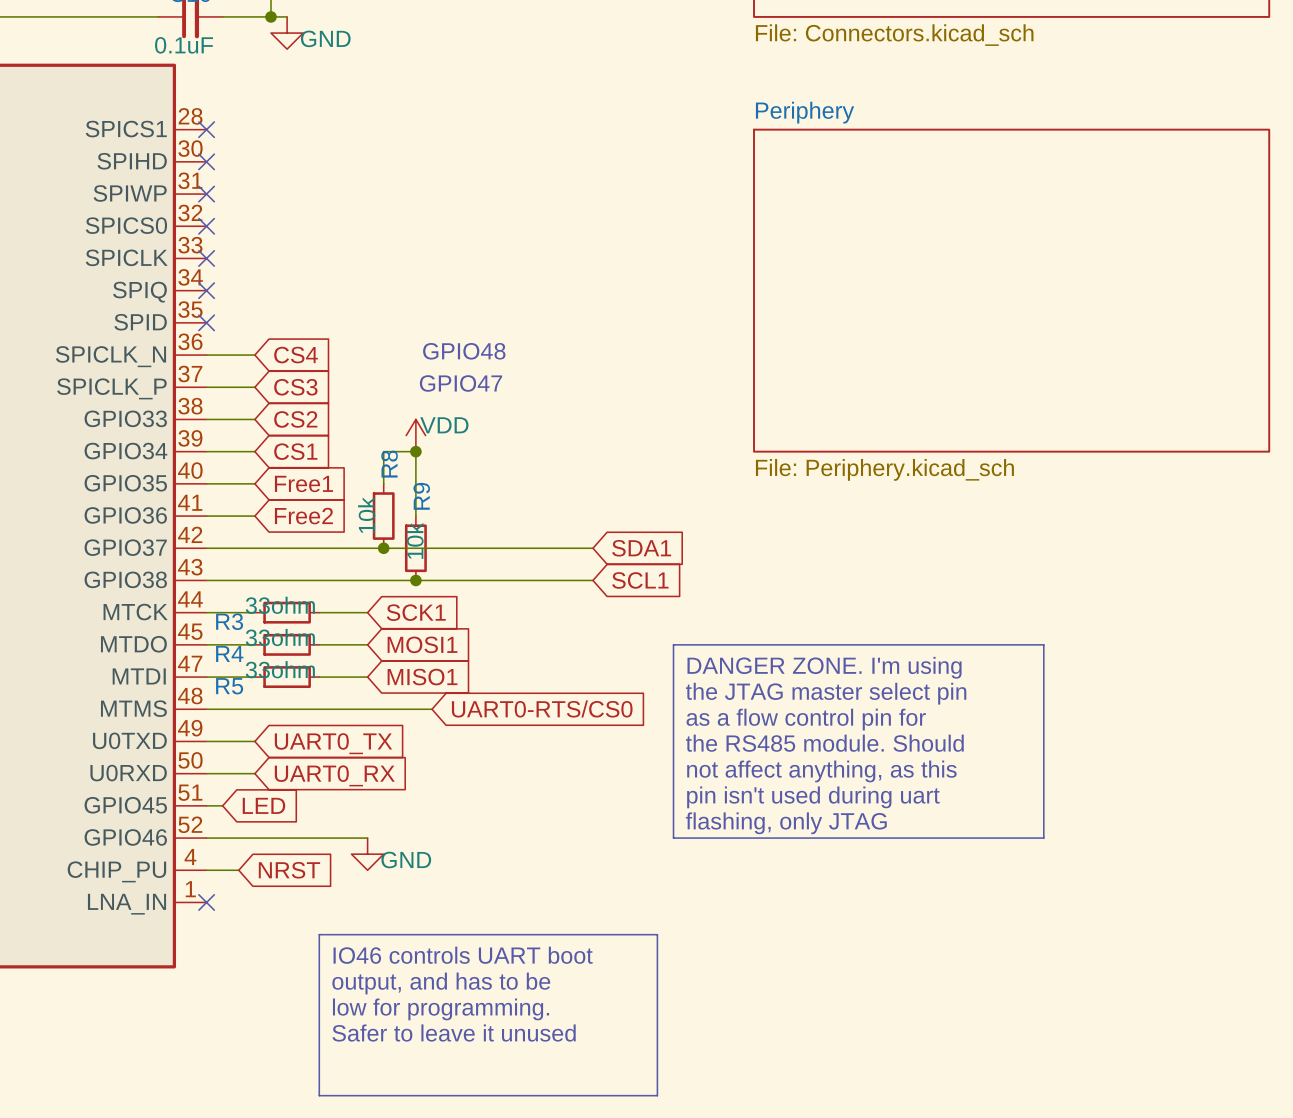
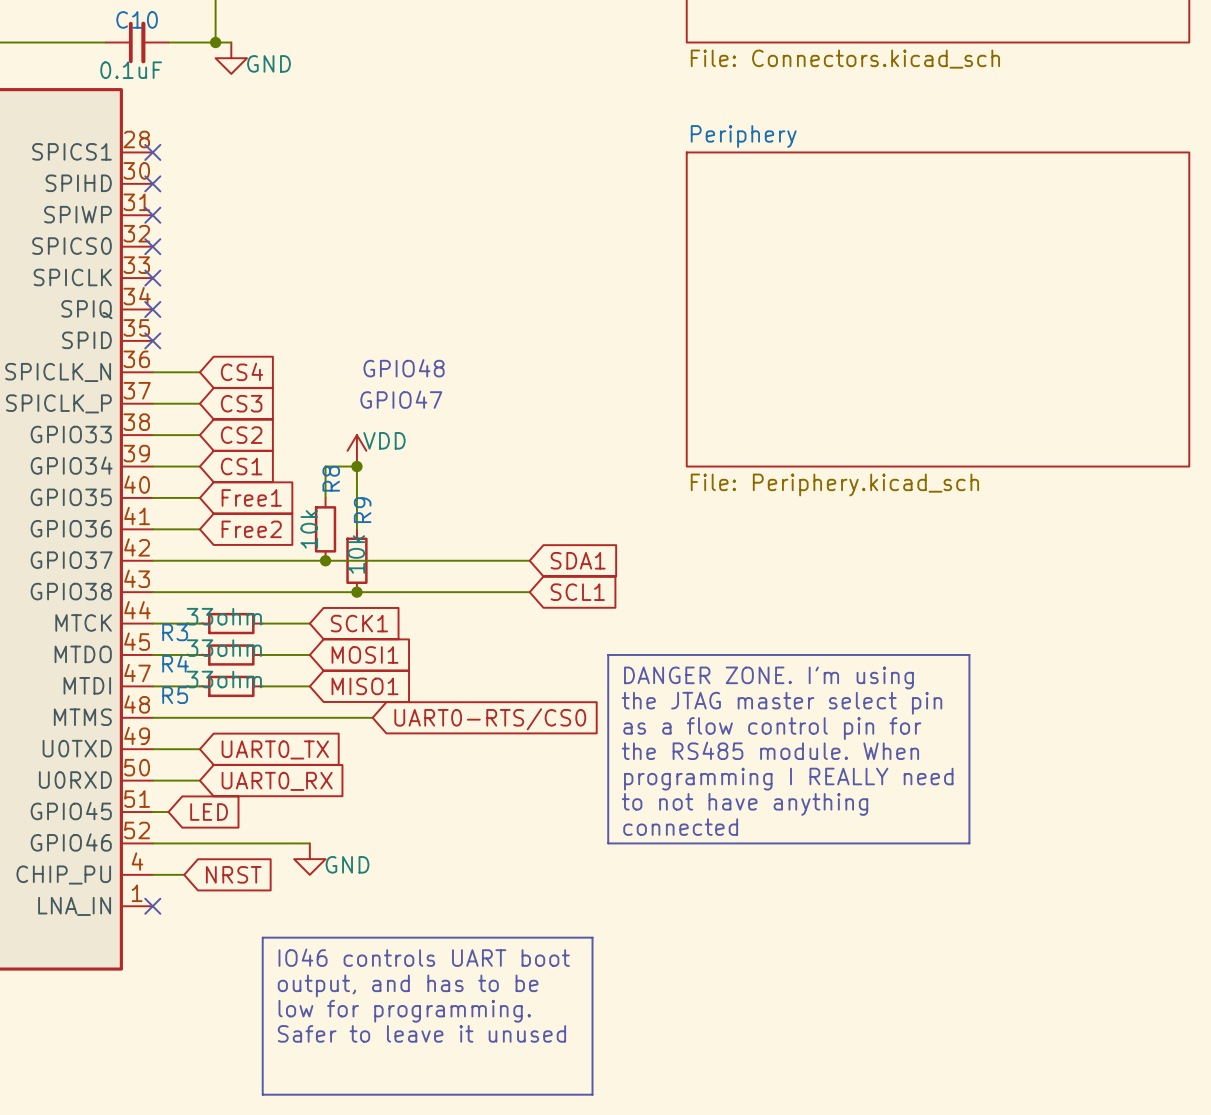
text: the RS485 module. Should (824, 743) -> the RS485 module. When (770, 750)
text: not affect anything, as this (821, 771) -> programming I REALLY need (788, 779)
text: pin isn't used during uart (813, 797) -> to not have anything (745, 804)
text: flashing, only JTAG (786, 823) -> connected (680, 827)

